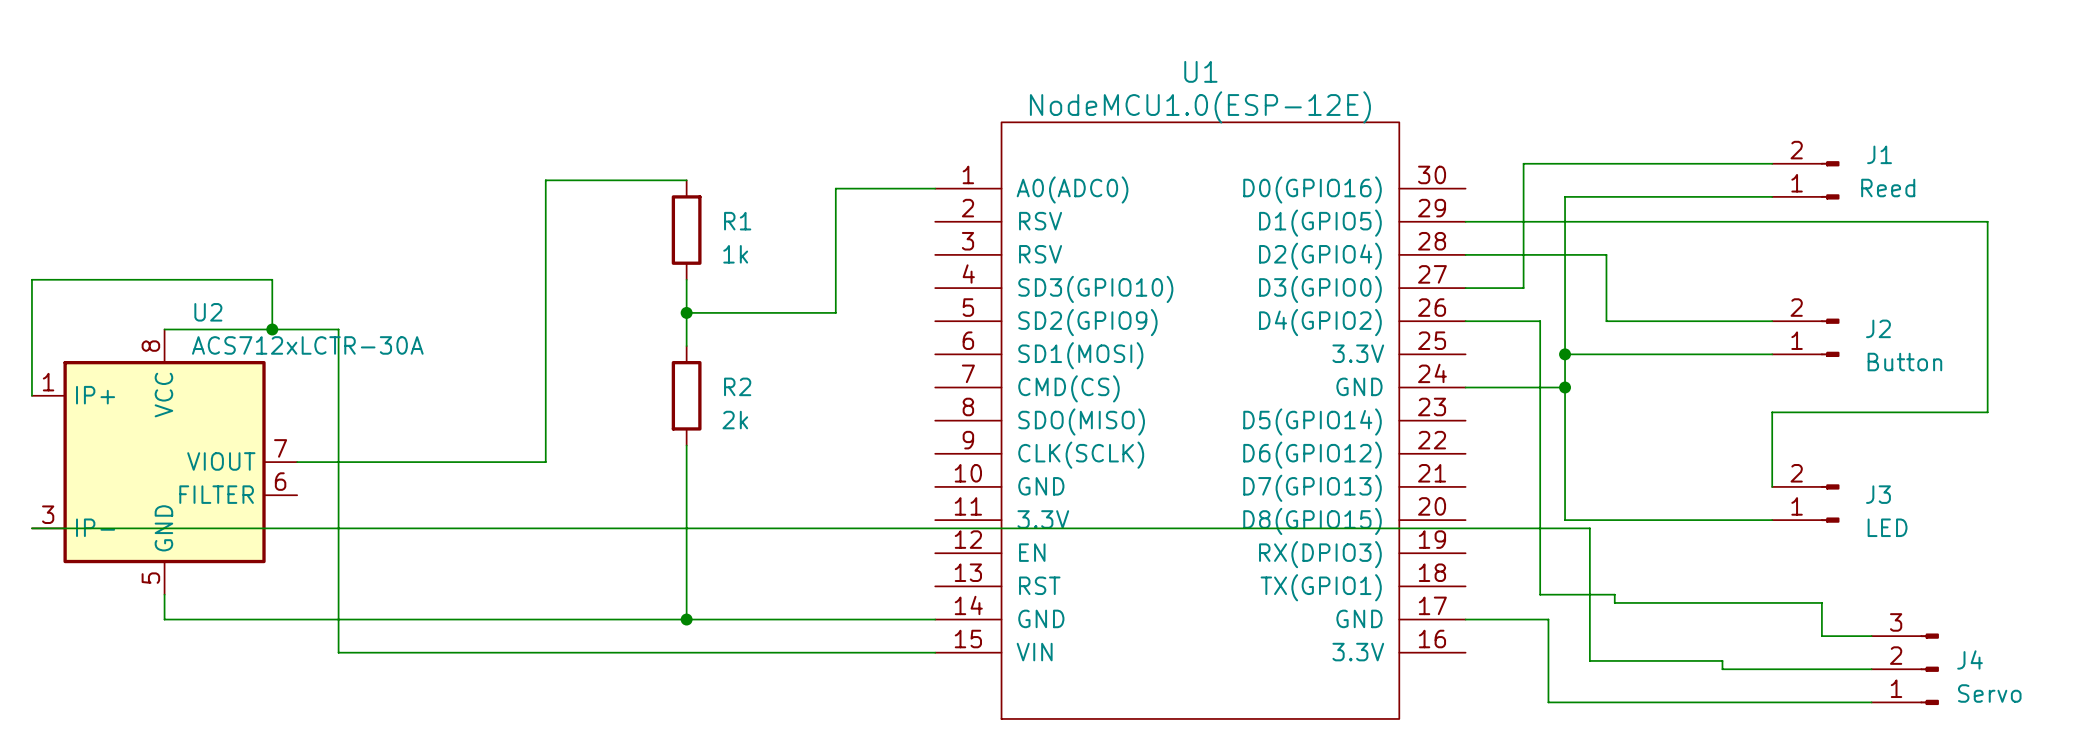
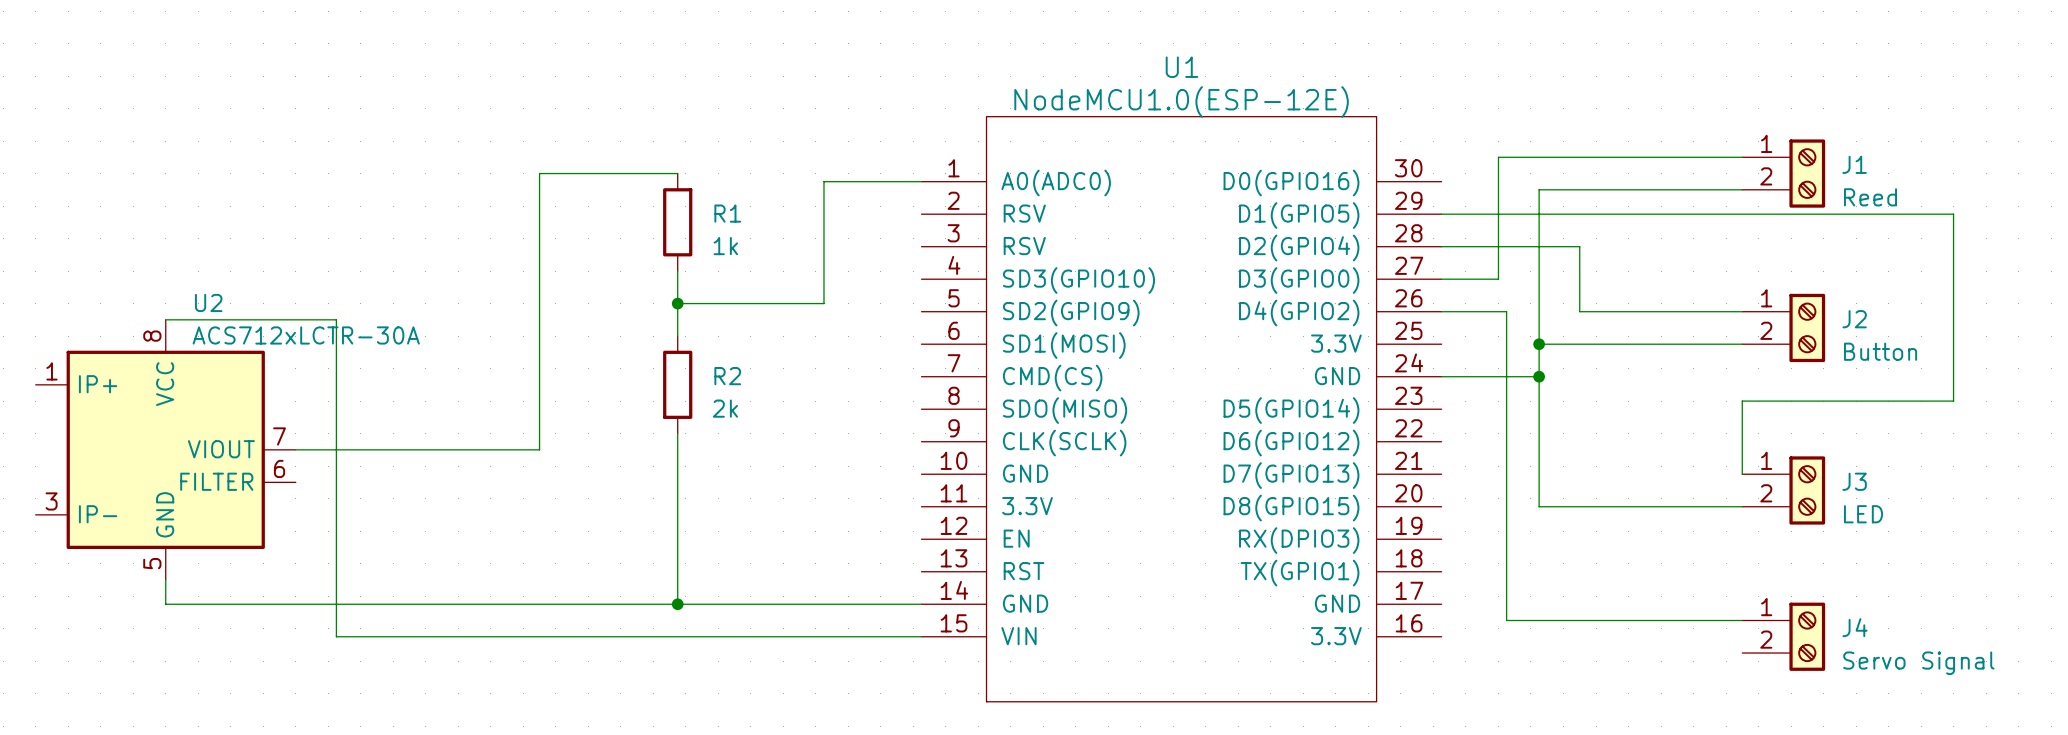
J1 symbol: [1772, 161, 1840, 200] -> [1742, 139, 1826, 208]
J2 symbol: [1772, 318, 1840, 358] -> [1742, 293, 1826, 363]
wire: (1531, 321) (1540, 321) (1540, 594) (1614, 594) (1614, 602) (1821, 602) (1821, 636) (1871, 636) -> (1506, 311) (1506, 620) (1742, 620)
wire: (272, 329) (272, 279) (31, 279) (31, 395) -> none
junction: (272, 329) -> none
J3 symbol: [1772, 484, 1840, 523] -> [1742, 456, 1826, 525]
wire: (31, 528) (1589, 528) (1589, 660) (1722, 660) (1722, 669) (1871, 669) -> none
wire: (1465, 619) (1548, 619) (1548, 702) (1871, 702) -> none
J4 symbol: [1871, 633, 1939, 706] -> [1742, 602, 1826, 671]
J4 value: Servo (1989, 693) -> Servo Signal (1918, 663)

